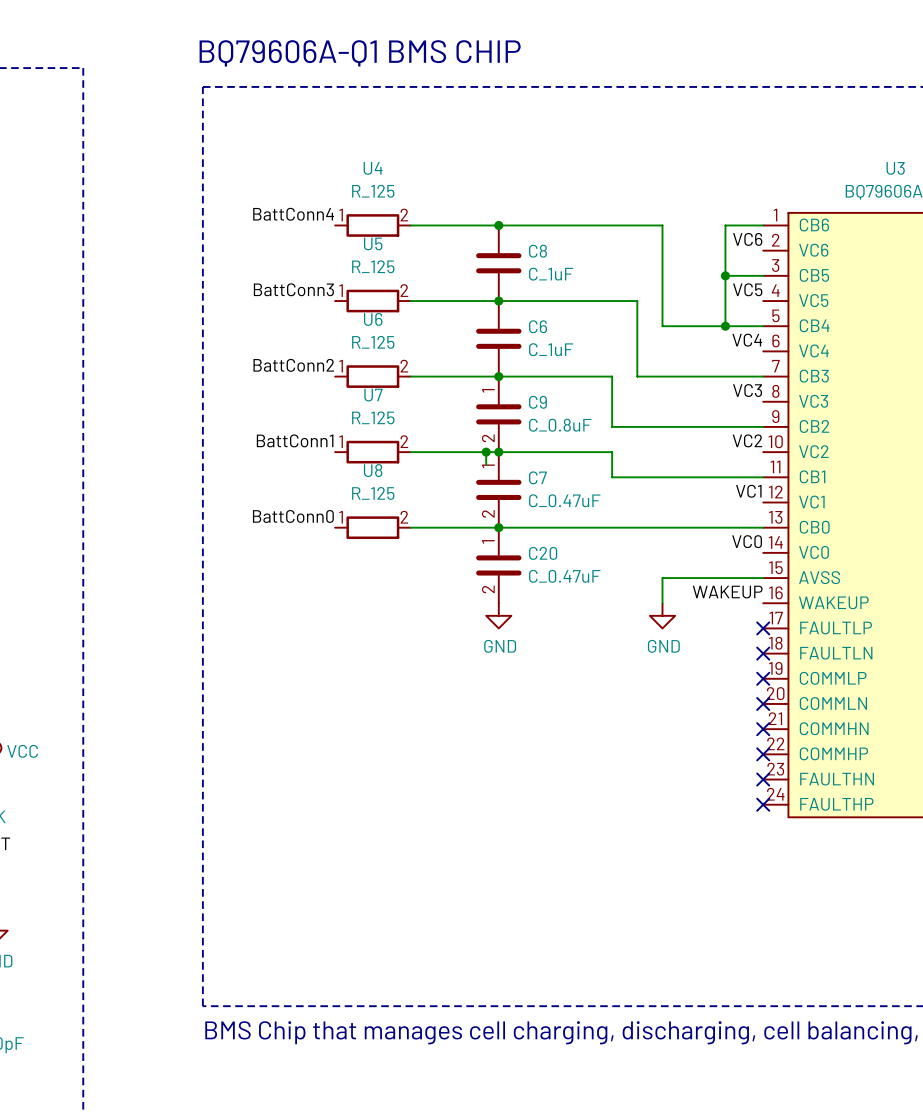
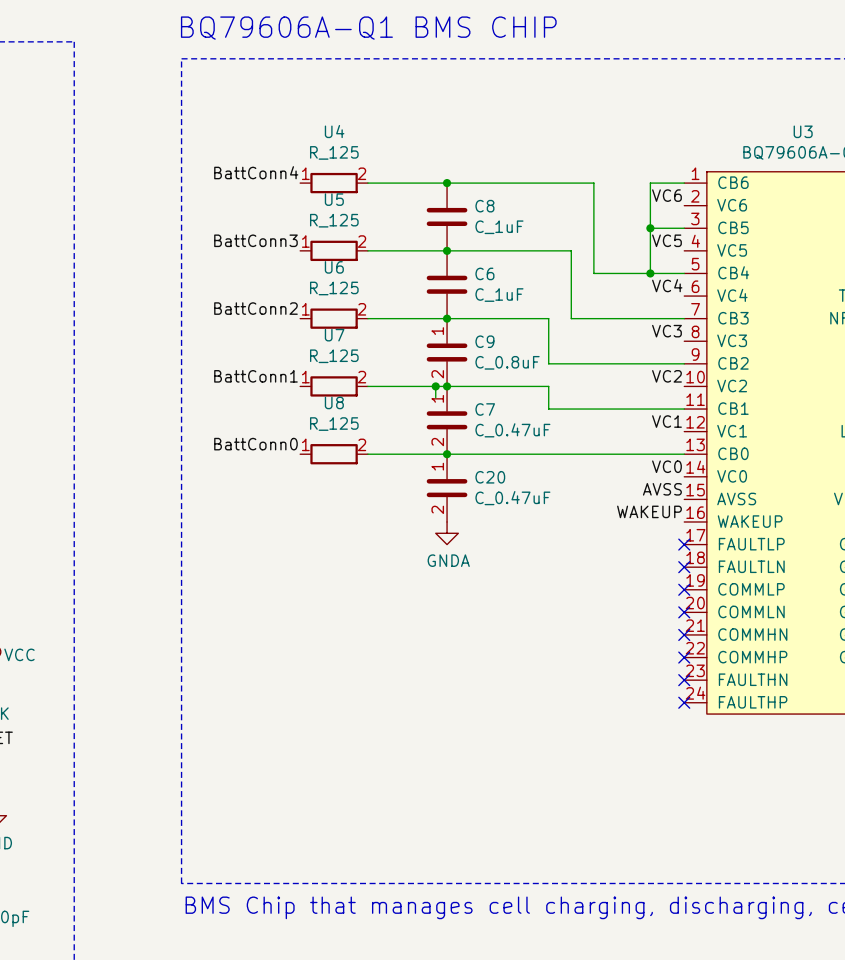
label: none -> AVSS (662, 489)
wire: (763, 578) (662, 578) (662, 603) -> none
power symbol: GND (498, 615) -> GNDA (447, 533)
power symbol: GND (662, 615) -> none

